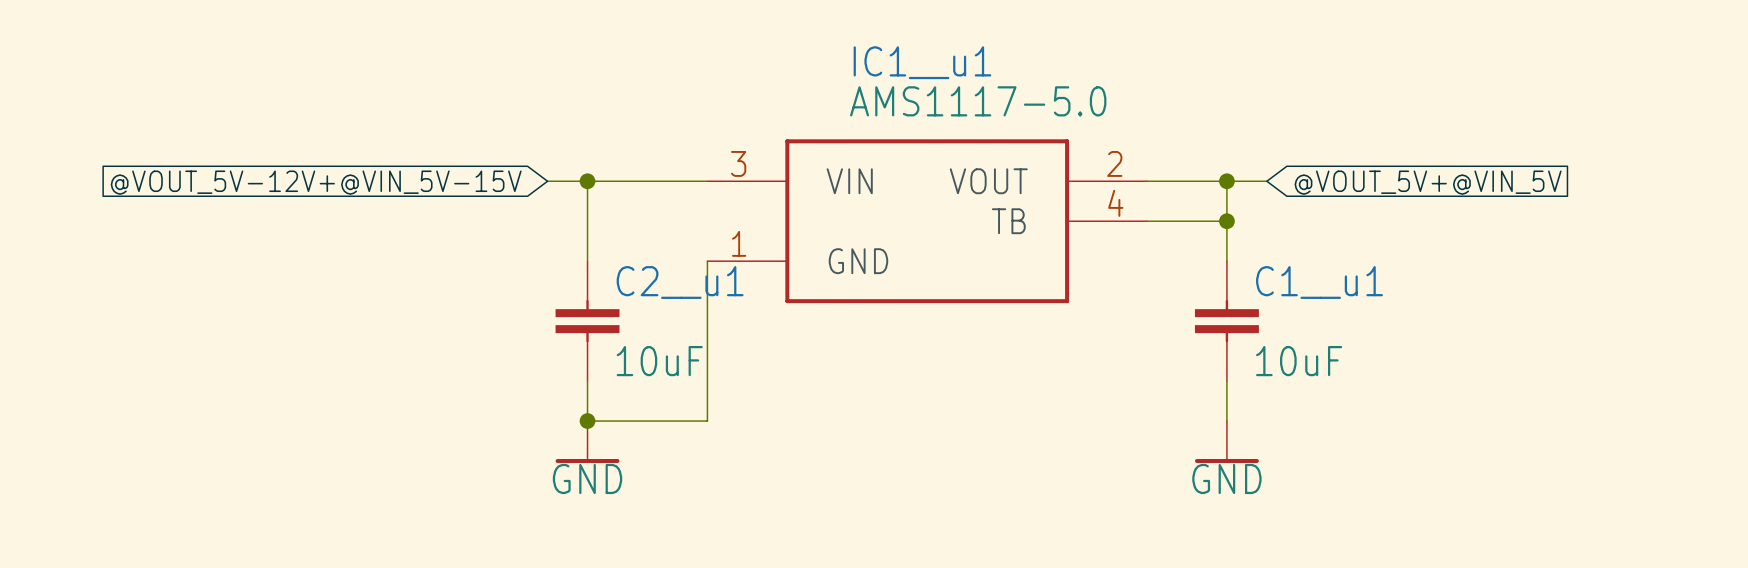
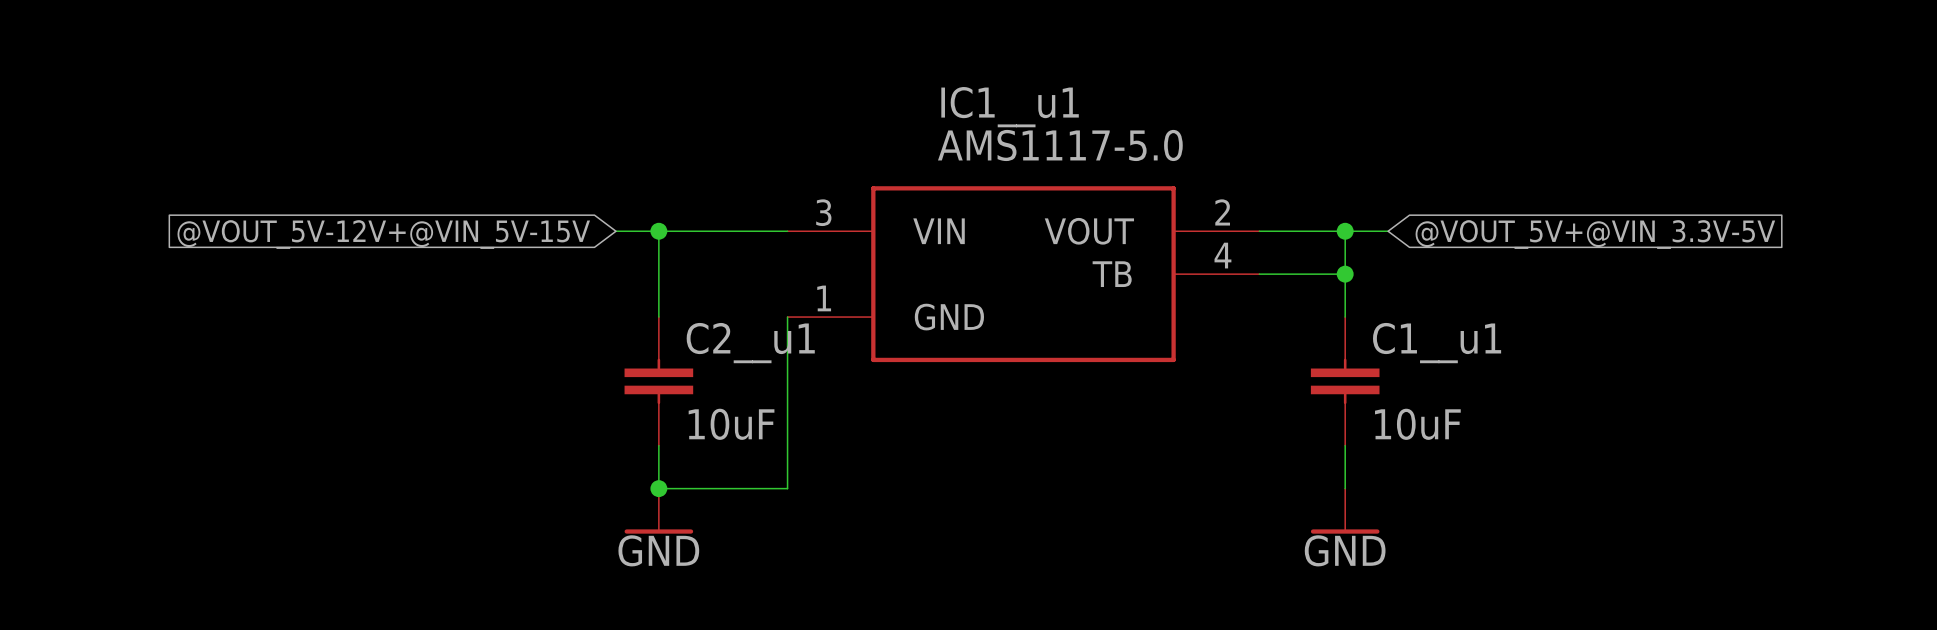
global label: @VOUT_5V+@VIN_5V (1428, 182) -> @VOUT_5V+@VIN_3.3V-5V (1595, 234)

